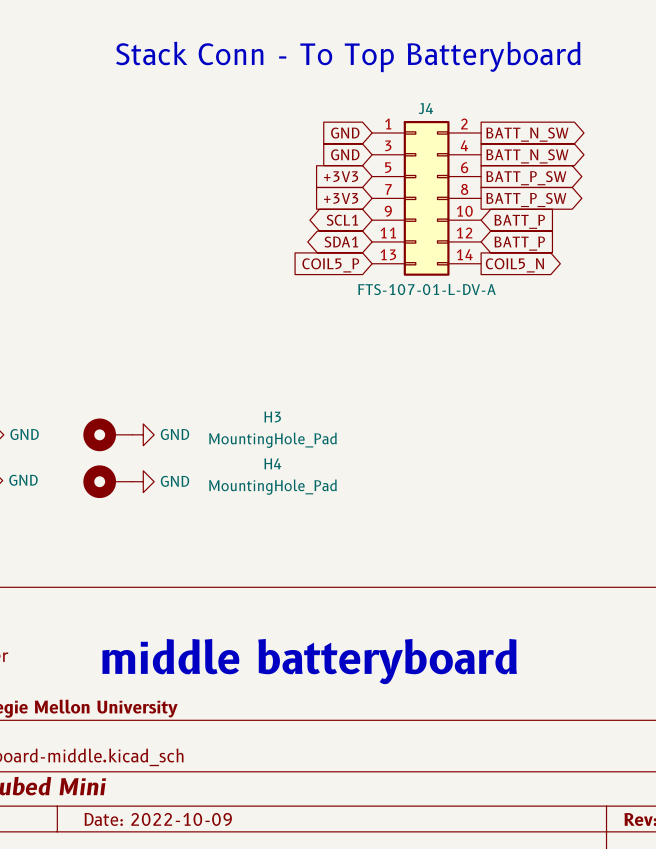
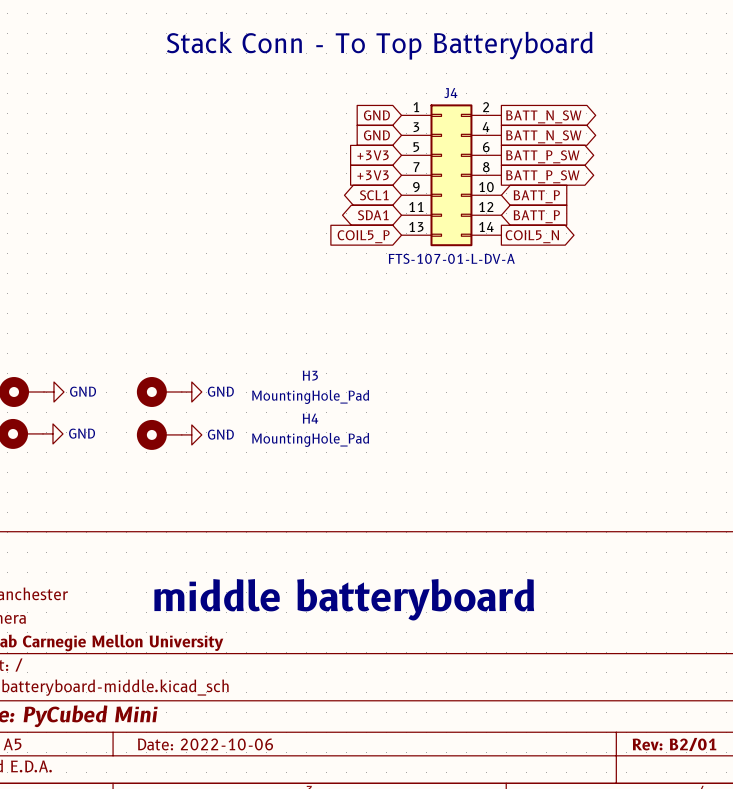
title block: Date: 2022-10-09 (158, 819) -> Date: 2022-10-06 (205, 744)

